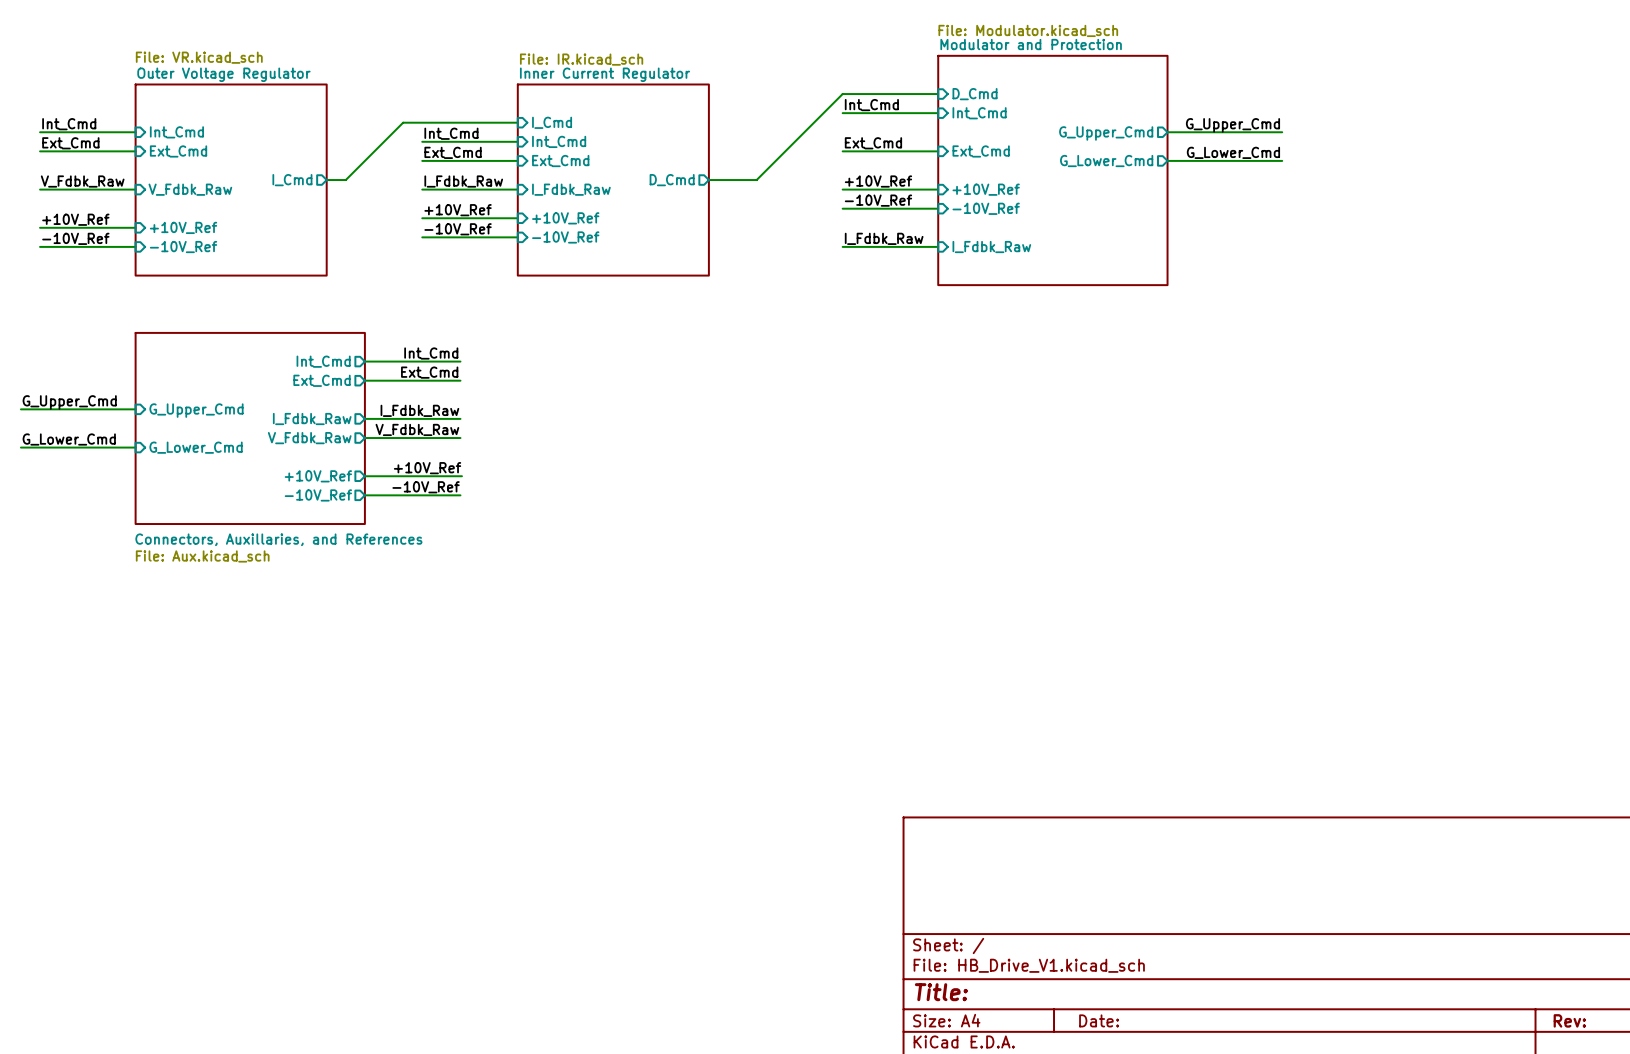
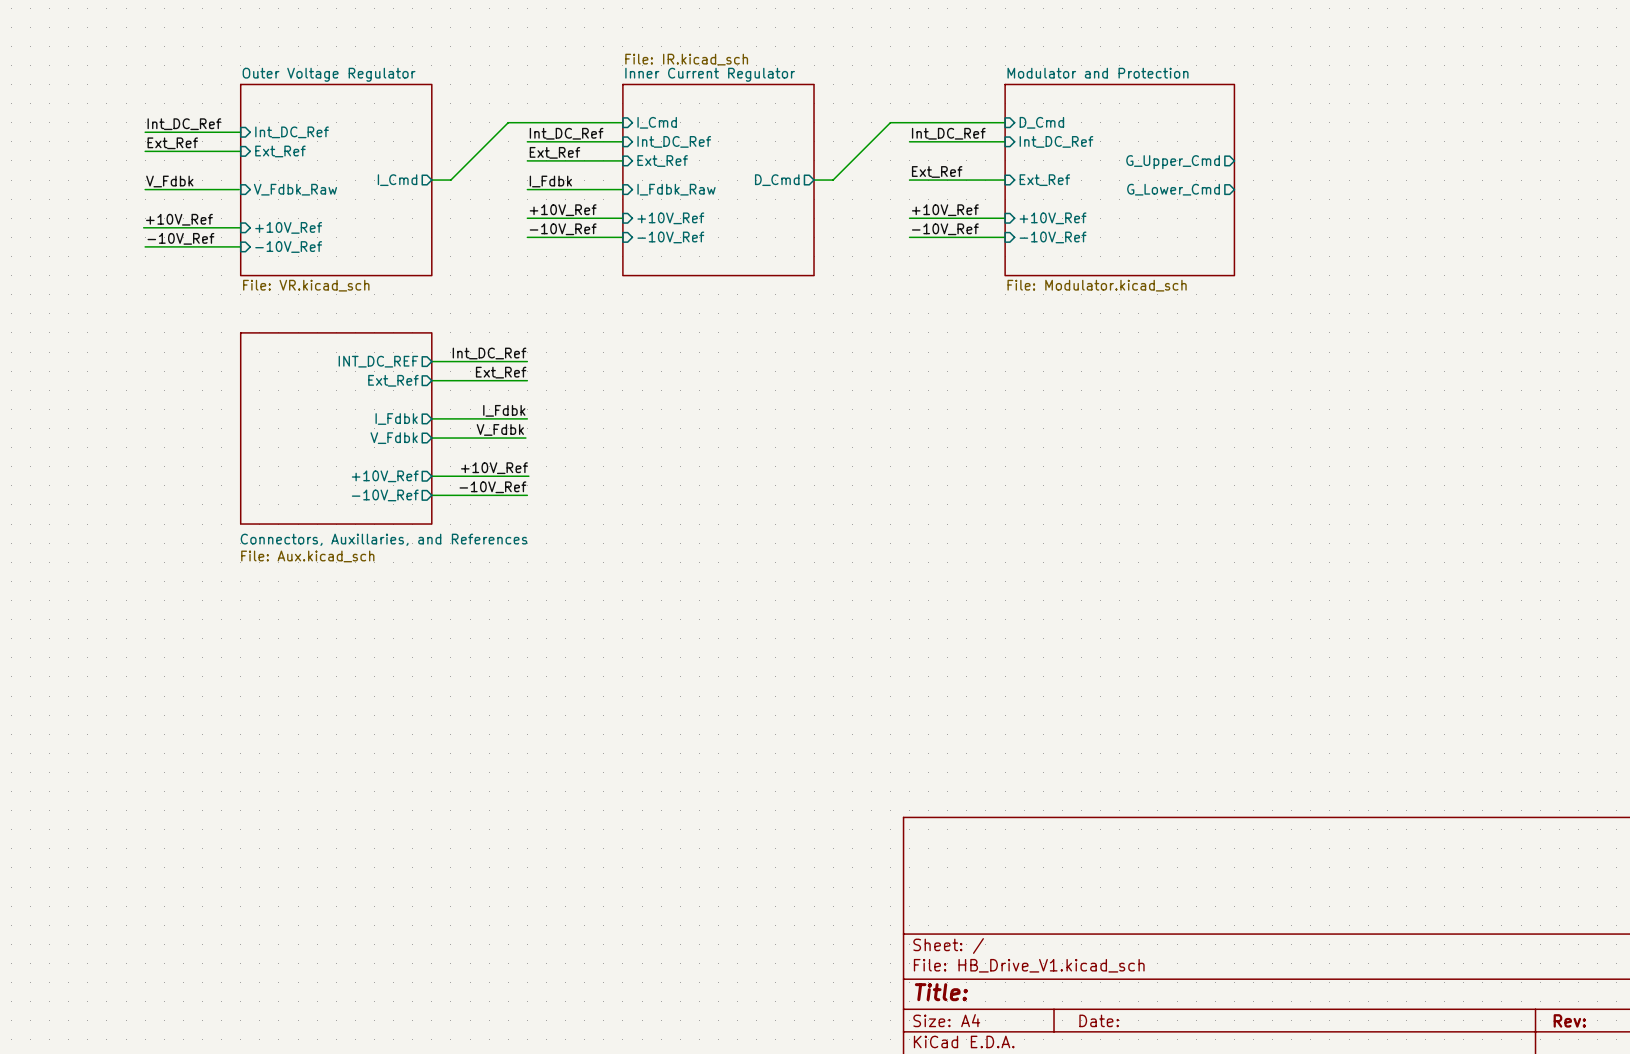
sheet Outer Voltage Regulator value position: File: VR.kicad_sch (199, 57) -> File: VR.kicad_sch (306, 285)
wire: (938, 94) (842, 94) (756, 180) (708, 180) -> none
sheet pin position: D_Cmd (975, 94) -> D_Cmd (1041, 122)
label: Int_Cmd (871, 105) -> none
wire: (842, 113) (938, 113) -> (909, 141) (1005, 141)
sheet pin: Int_Cmd (979, 113) -> none
wire: (508, 122) (403, 122) (345, 180) (326, 180) -> (508, 122) (450, 180) (431, 180)
wire: none -> (517, 122) (622, 122)
sheet pin: I_Cmd (552, 122) -> none
sheet pin: none -> I_Cmd (657, 122)
wire: none -> (1005, 122) (890, 122) (833, 180) (814, 180)
label: Int_Cmd (69, 124) -> none
label: none -> Int_DC_Ref (184, 124)
label: G_Upper_Cmd (1232, 125) -> none
wire: (40, 132) (135, 132) -> (145, 132) (240, 132)
sheet pin: Int_Cmd (176, 132) -> none
sheet pin: none -> Int_DC_Ref (292, 132)
wire: (1167, 132) (1282, 132) -> none
label: Int_Cmd (451, 133) -> none
label: none -> Int_DC_Ref (566, 133)
label: none -> Int_DC_Ref (948, 133)
sheet pin position: G_Upper_Cmd (1106, 133) -> G_Upper_Cmd (1173, 162)
wire: (422, 141) (517, 141) -> (527, 141) (622, 141)
sheet pin: Int_Cmd (559, 141) -> none
sheet pin: none -> Int_DC_Ref (674, 141)
sheet pin: none -> Int_DC_Ref (1056, 141)
label: Ext_Cmd (70, 143) -> none
label: none -> Ext_Ref (172, 143)
label: Ext_Cmd (873, 143) -> none
wire: (40, 151) (135, 151) -> (145, 151) (240, 151)
sheet pin: Ext_Cmd (178, 151) -> none
sheet pin: none -> Ext_Ref (280, 151)
wire: (842, 151) (938, 151) -> (909, 180) (1005, 180)
sheet pin: Ext_Cmd (981, 151) -> none
label: Ext_Cmd (453, 152) -> none
label: none -> Ext_Ref (554, 152)
label: G_Lower_Cmd (1233, 152) -> none
wire: (422, 160) (517, 160) -> (527, 160) (622, 160)
wire: (1167, 160) (1282, 160) -> none
sheet pin: Ext_Cmd (560, 161) -> none
sheet pin: none -> Ext_Ref (662, 161)
sheet pin position: G_Lower_Cmd (1106, 161) -> G_Lower_Cmd (1173, 189)
sheet Modulator and Protection: File: Modulator.kicad_sch (1052, 170) -> none
label: none -> Ext_Ref (937, 171)
sheet Outer Voltage Regulator position: (231, 180) -> (336, 180)
sheet pin: I_Cmd (292, 180) -> none
sheet pin: none -> I_Cmd (397, 180)
sheet Inner Current Regulator position: (613, 180) -> (718, 180)
sheet pin: D_Cmd (672, 180) -> none
sheet pin: none -> D_Cmd (777, 180)
sheet pin: none -> Ext_Ref (1044, 180)
sheet Modulator and Protection: none -> File: Modulator.kicad_sch (1119, 180)
label: V_Fdbk_Raw (82, 181) -> none
label: none -> V_Fdbk (169, 181)
label: I_Fdbk_Raw (463, 181) -> none
label: none -> I_Fdbk (550, 181)
label position: +10V_Ref (878, 181) -> +10V_Ref (945, 210)
wire: (40, 189) (135, 189) -> none
wire: none -> (145, 189) (239, 189)
sheet pin position: V_Fdbk_Raw (190, 189) -> V_Fdbk_Raw (295, 189)
wire: (422, 189) (517, 189) -> (527, 189) (622, 189)
sheet pin position: I_Fdbk_Raw (571, 189) -> I_Fdbk_Raw (676, 189)
wire: (842, 189) (938, 189) -> (909, 218) (1005, 218)
sheet pin position: +10V_Ref (986, 189) -> +10V_Ref (1053, 218)
label position: -10V_Ref (878, 200) -> -10V_Ref (945, 229)
wire: (842, 208) (938, 208) -> (909, 237) (1005, 237)
sheet pin position: -10V_Ref (986, 208) -> -10V_Ref (1053, 237)
label position: +10V_Ref (458, 210) -> +10V_Ref (563, 210)
wire: (422, 218) (517, 218) -> (527, 218) (622, 218)
sheet pin position: +10V_Ref (565, 218) -> +10V_Ref (670, 218)
label position: +10V_Ref (75, 219) -> +10V_Ref (179, 219)
wire: (40, 227) (135, 227) -> none
wire: none -> (143, 227) (240, 227)
sheet pin position: +10V_Ref (183, 227) -> +10V_Ref (288, 227)
label position: -10V_Ref (458, 229) -> -10V_Ref (563, 229)
wire: (422, 237) (517, 237) -> (527, 237) (622, 237)
sheet pin position: -10V_Ref (565, 237) -> -10V_Ref (670, 237)
label position: -10V_Ref (75, 238) -> -10V_Ref (180, 238)
label: I_Fdbk_Raw (884, 238) -> none
wire: (40, 246) (135, 246) -> (145, 246) (240, 246)
wire: (842, 246) (938, 246) -> none
sheet pin position: -10V_Ref (183, 247) -> -10V_Ref (288, 247)
sheet pin: I_Fdbk_Raw (991, 247) -> none
label: Int_Cmd (431, 353) -> none
label: none -> Int_DC_Ref (489, 353)
sheet pin: Int_Cmd (323, 361) -> none
wire: (364, 361) (431, 361) -> (460, 361) (527, 361)
sheet pin: none -> INT_DC_REF (378, 361)
label: Ext_Cmd (429, 372) -> none
label: none -> Ext_Ref (501, 372)
sheet pin: Ext_Cmd (322, 380) -> none
wire: (364, 380) (431, 380) -> (460, 380) (527, 380)
sheet pin: none -> Ext_Ref (393, 380)
label: G_Upper_Cmd (69, 402) -> none
wire: (20, 409) (135, 409) -> none
sheet pin: G_Upper_Cmd (196, 410) -> none
label: I_Fdbk_Raw (419, 410) -> none
label: none -> I_Fdbk (504, 410)
wire: (364, 418) (431, 418) -> (460, 418) (527, 418)
sheet pin: I_Fdbk_Raw (312, 419) -> none
sheet pin: none -> I_Fdbk (396, 419)
sheet Connectors, Auxillaries, and References: File: Aux.kicad_sch (250, 428) -> none
sheet Connectors, Auxillaries, and References: none -> File: Aux.kicad_sch (336, 428)
label: V_Fdbk_Raw (417, 429) -> none
label: none -> V_Fdbk (500, 429)
sheet pin: V_Fdbk_Raw (309, 438) -> none
wire: (364, 438) (431, 438) -> none
sheet pin: none -> V_Fdbk (394, 438)
wire: none -> (460, 438) (525, 438)
label: G_Lower_Cmd (69, 439) -> none
wire: (20, 447) (135, 447) -> none
sheet pin: G_Lower_Cmd (196, 447) -> none
label position: +10V_Ref (427, 468) -> +10V_Ref (494, 468)
sheet pin position: +10V_Ref (318, 476) -> +10V_Ref (385, 476)
wire: (364, 476) (431, 476) -> (461, 476) (528, 476)
label position: -10V_Ref (426, 487) -> -10V_Ref (492, 487)
sheet pin position: -10V_Ref (318, 495) -> -10V_Ref (385, 495)
wire: (364, 495) (431, 495) -> (460, 495) (527, 495)

